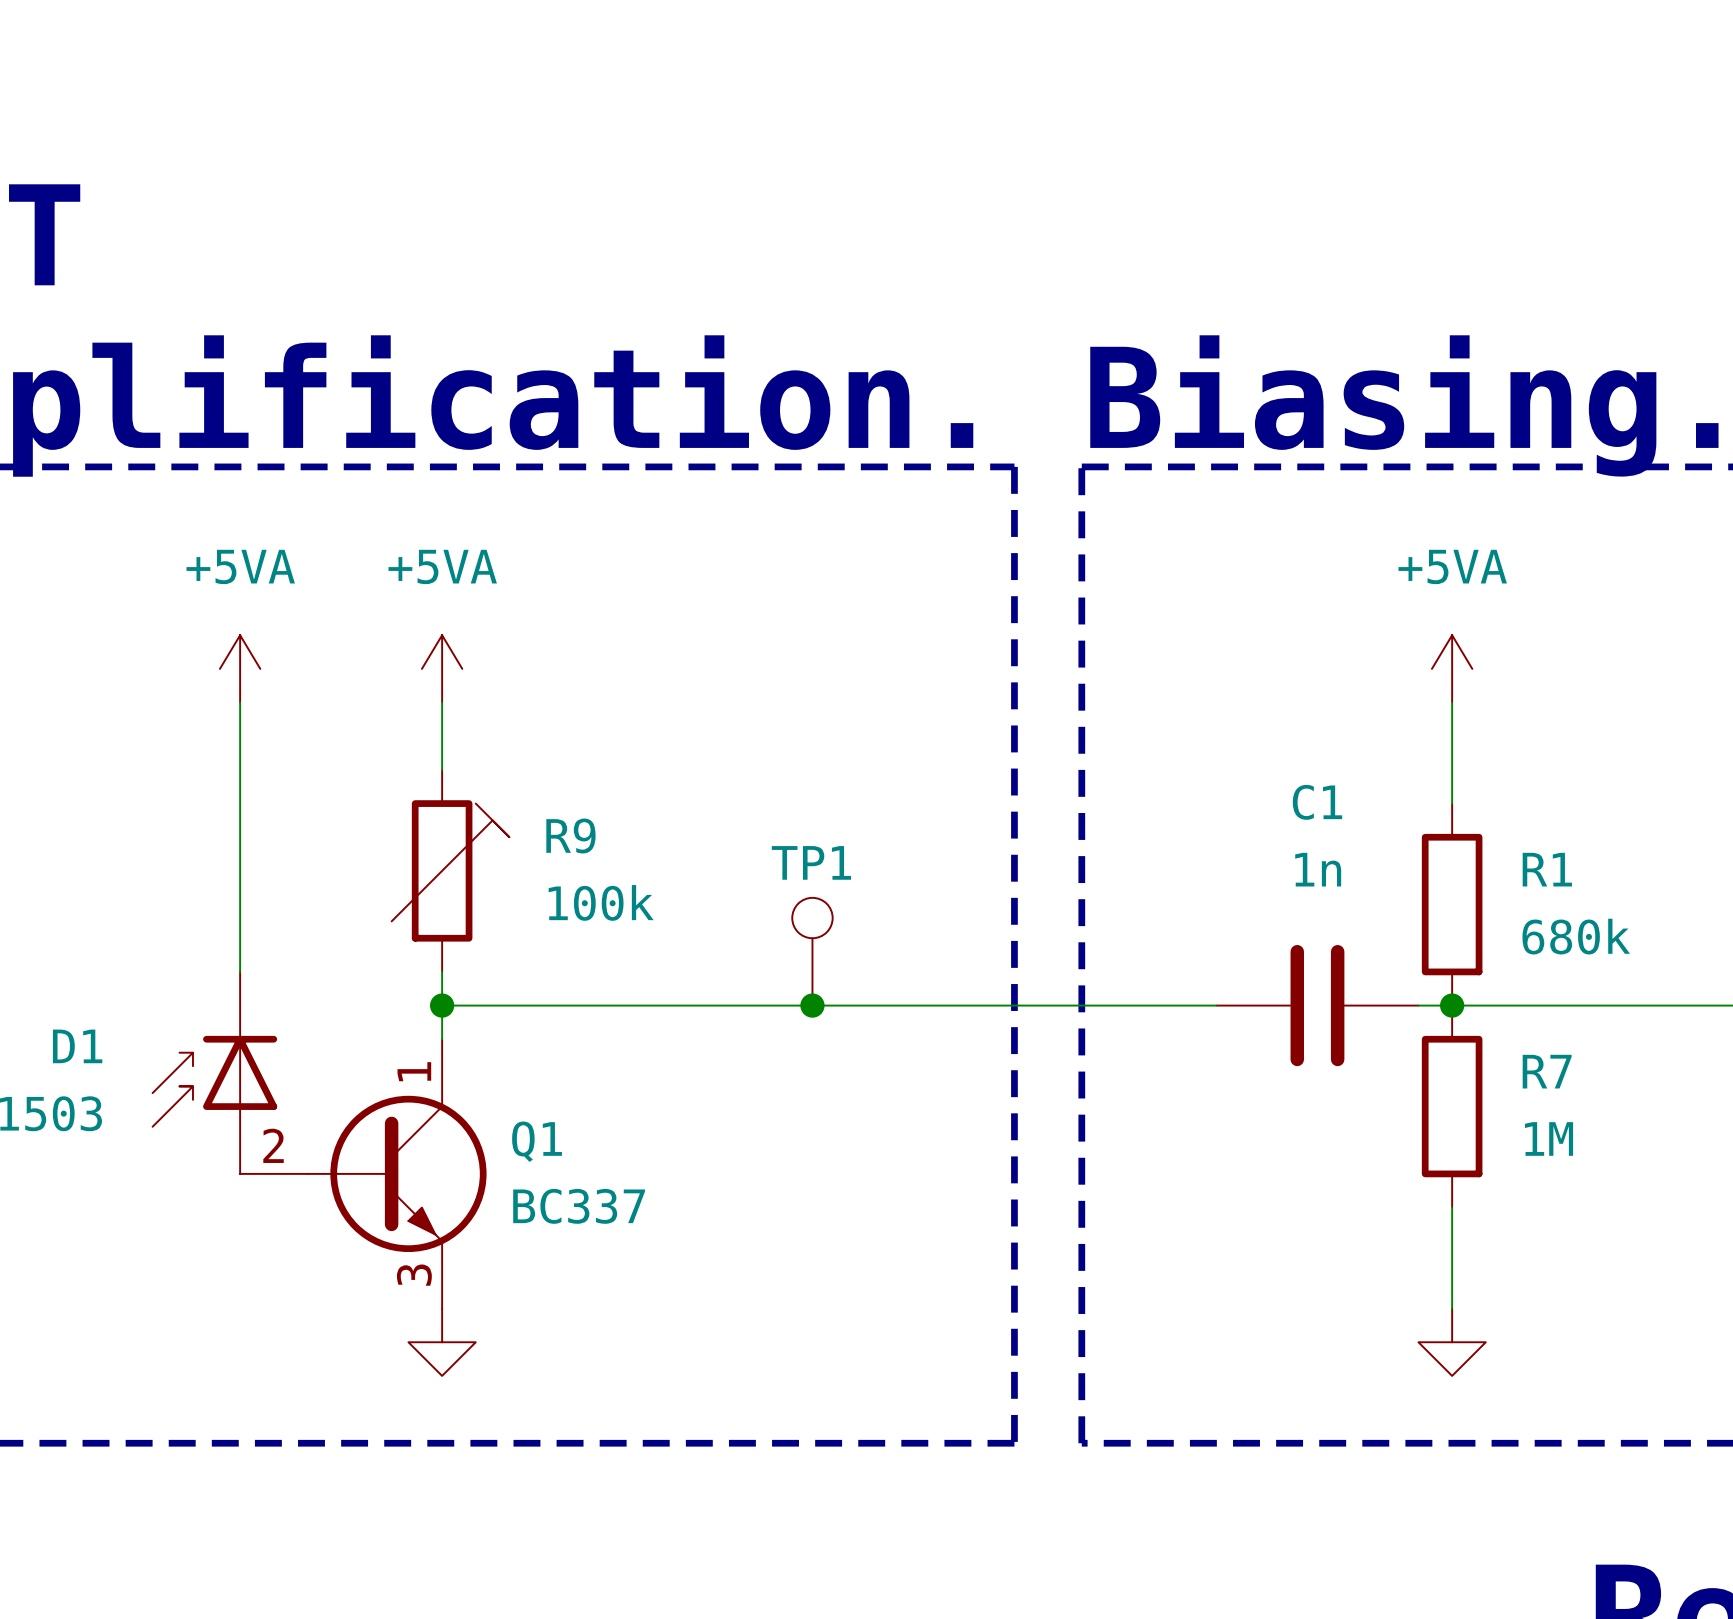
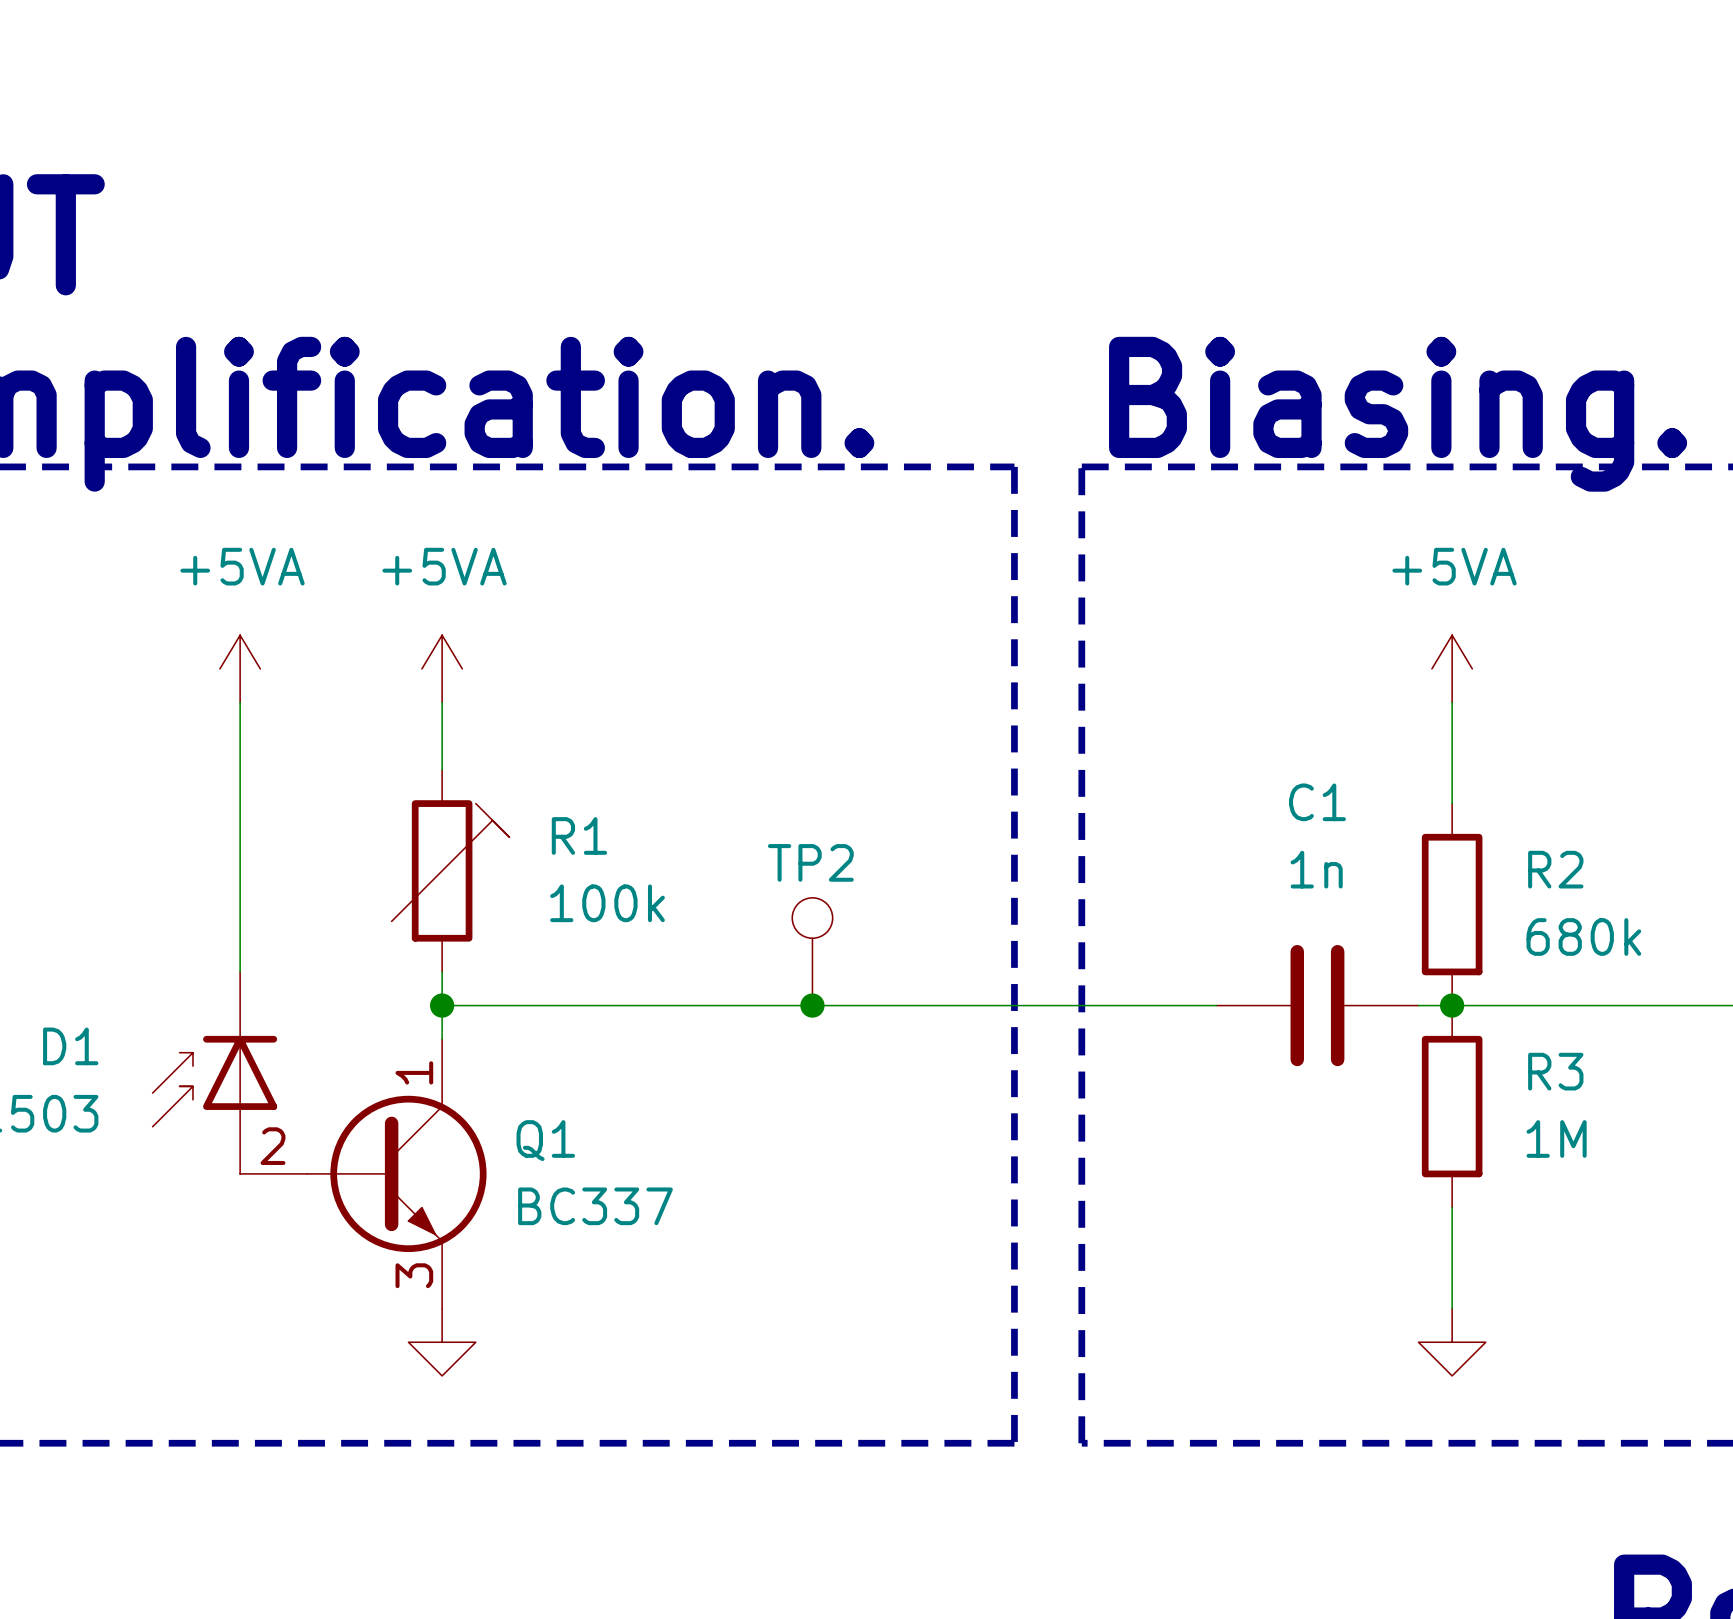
R9 name: R9 (570, 836) -> R1 (579, 835)
TP1 name: TP1 (811, 862) -> TP2 (810, 862)
R1 name: R1 (1547, 869) -> R2 (1555, 869)
R7 name: R7 (1547, 1071) -> R3 (1555, 1071)

